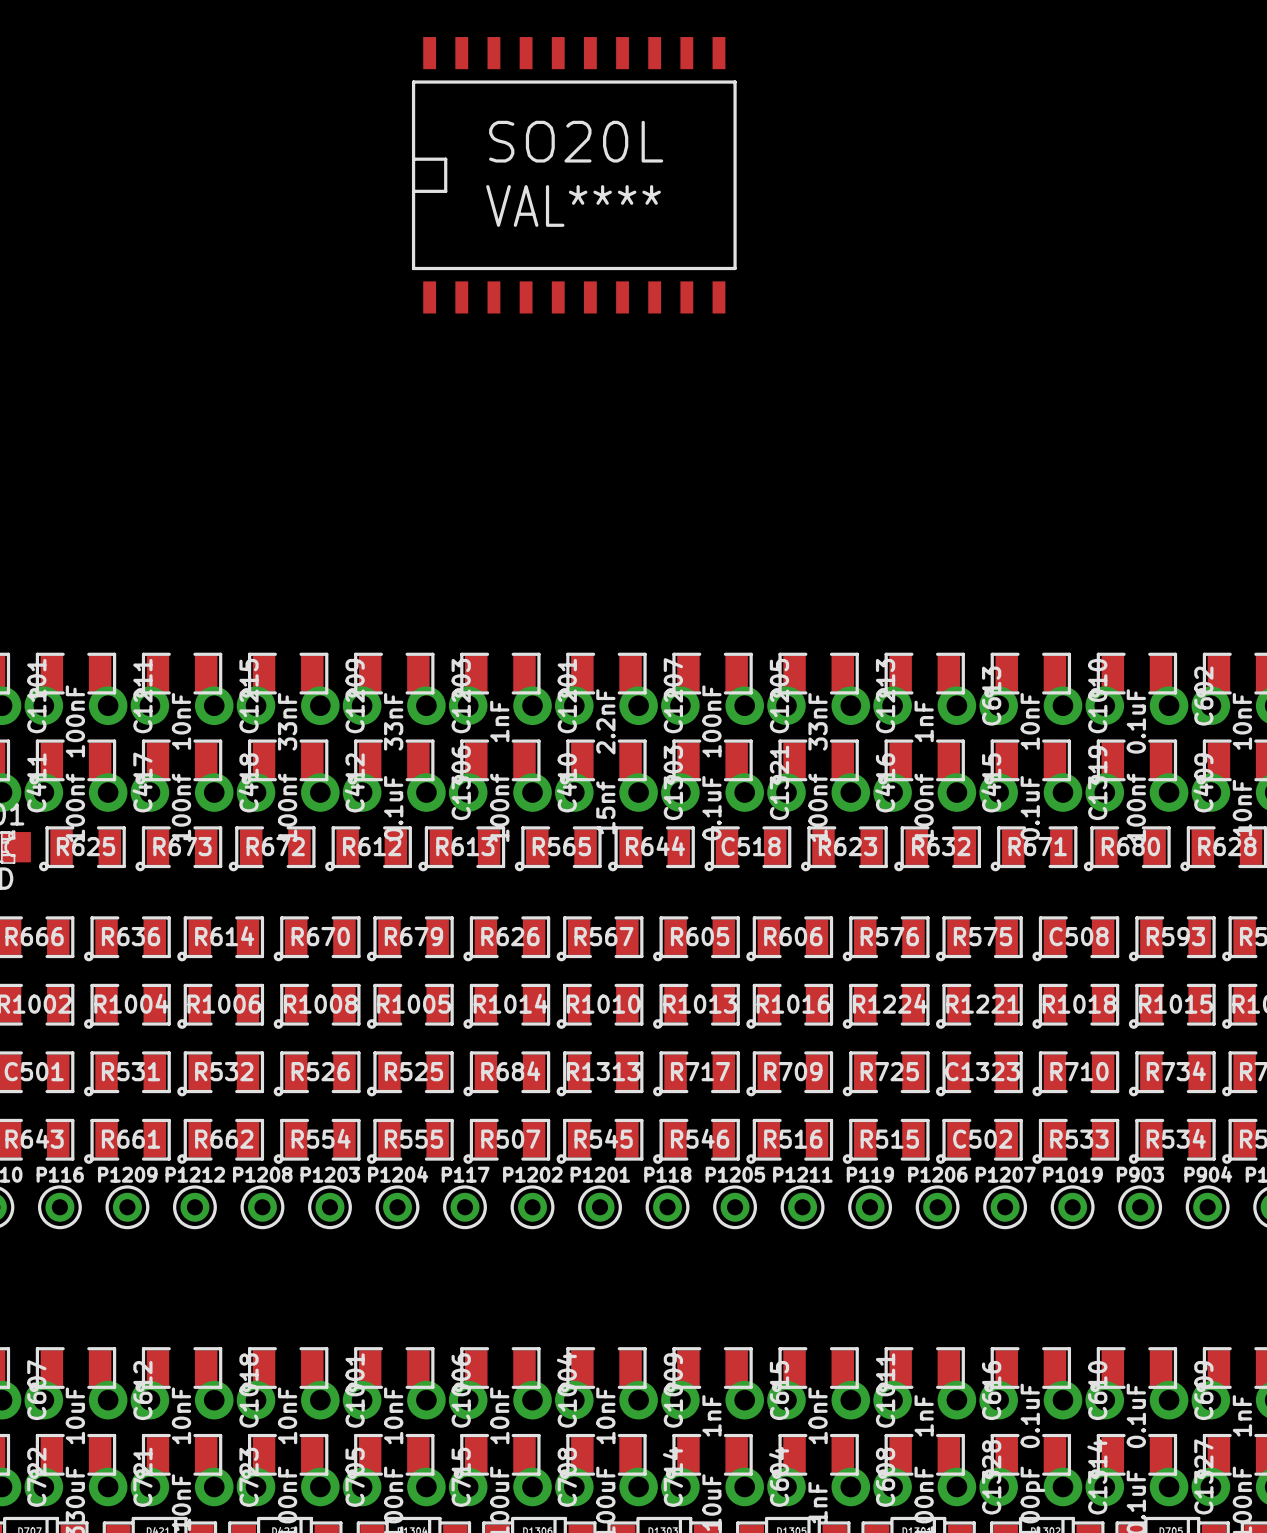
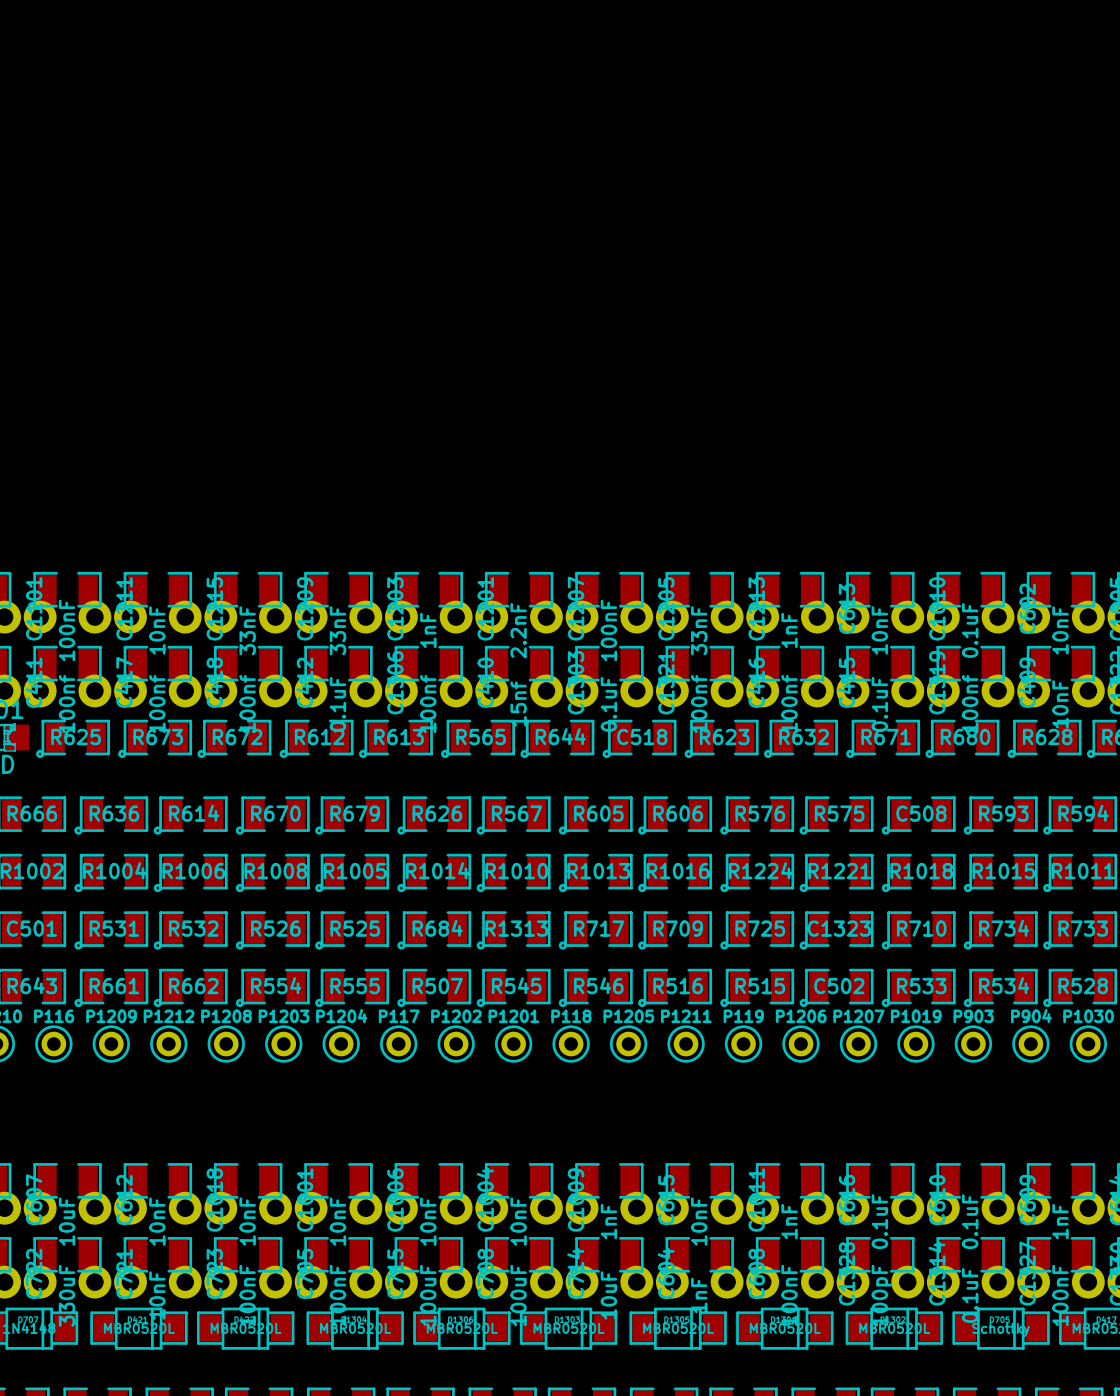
SO20L: VAL**** (574, 175) -> none

